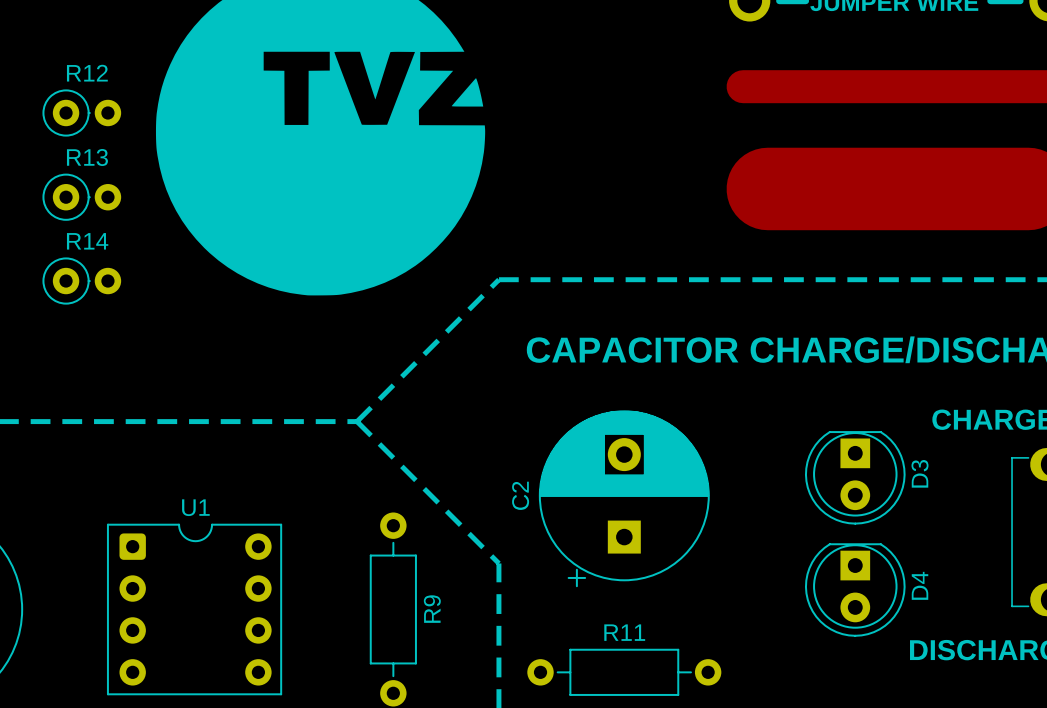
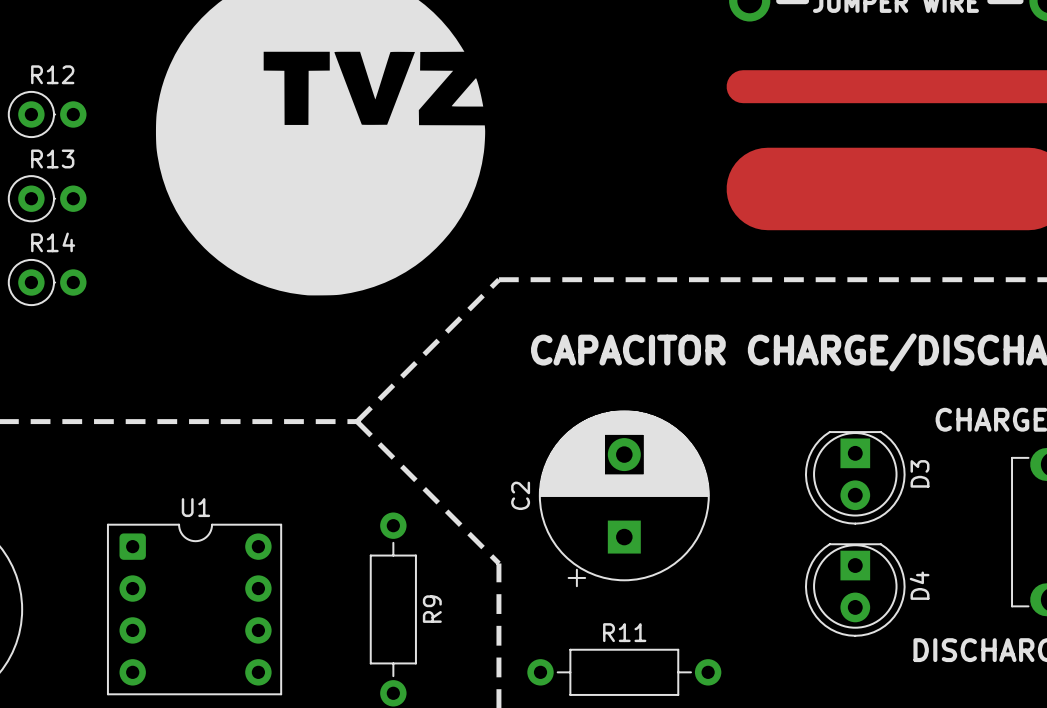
R12 position: (81, 113) -> (47, 114)
R13 position: (81, 197) -> (47, 198)
R14 position: (81, 281) -> (47, 282)

